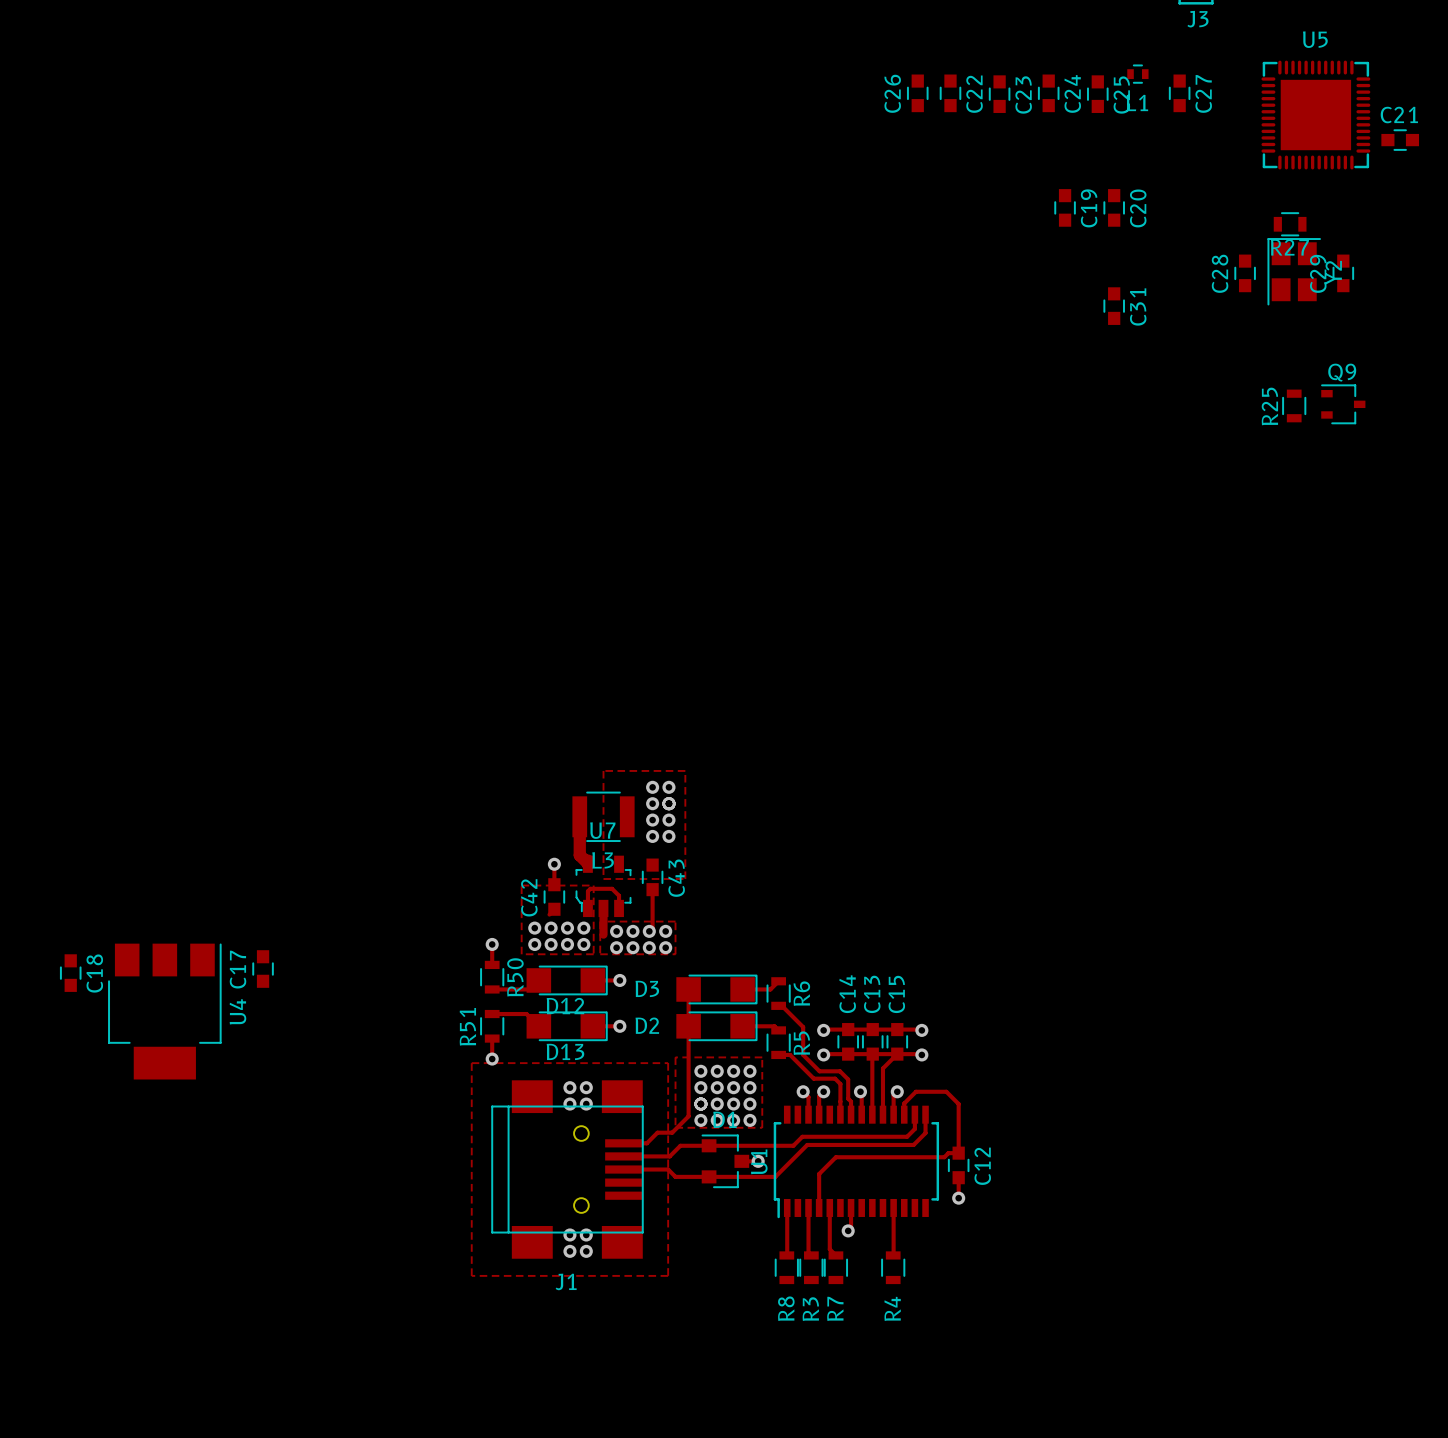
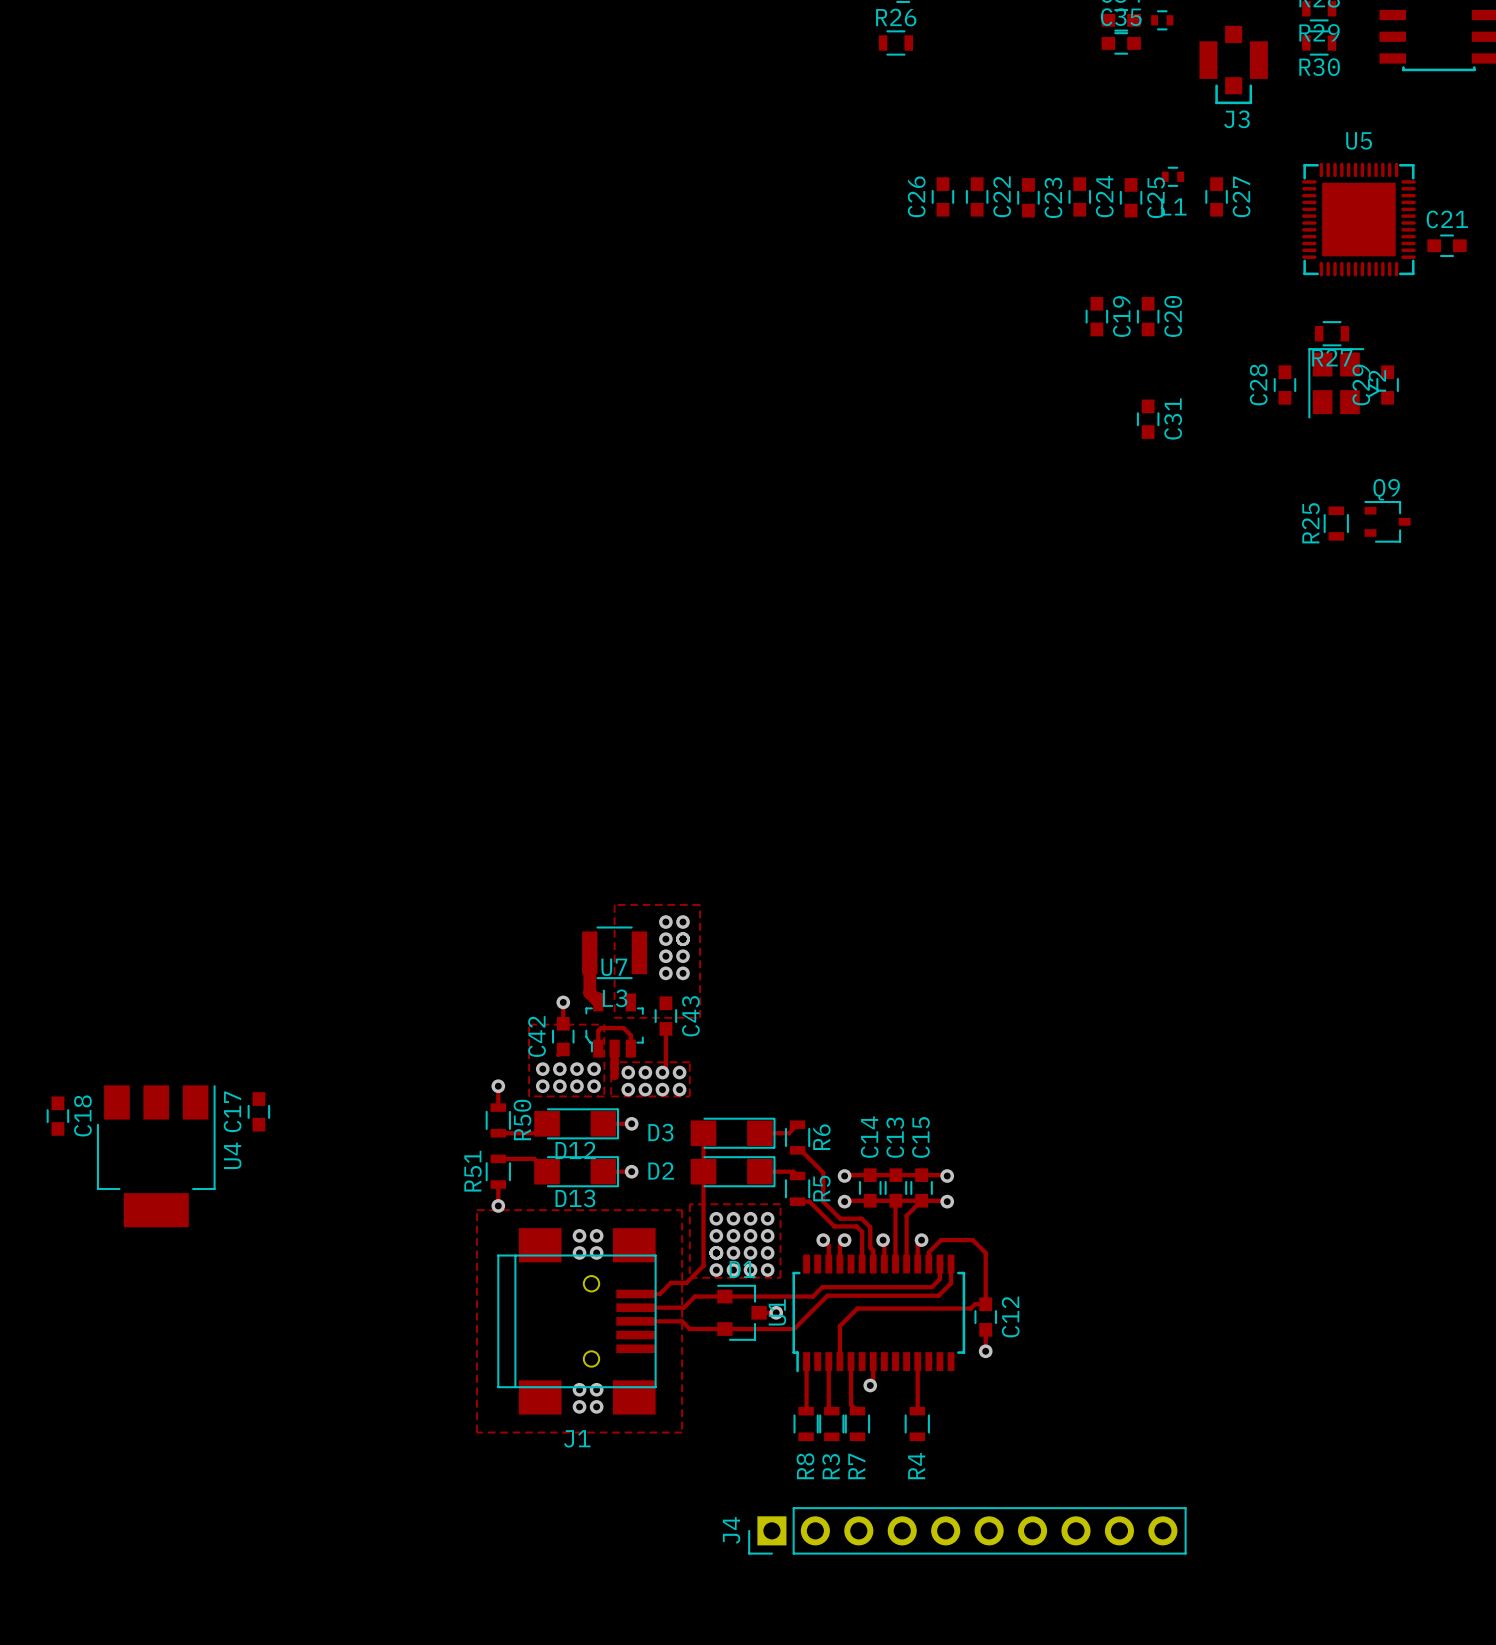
J4: none -> (967, 1530)

